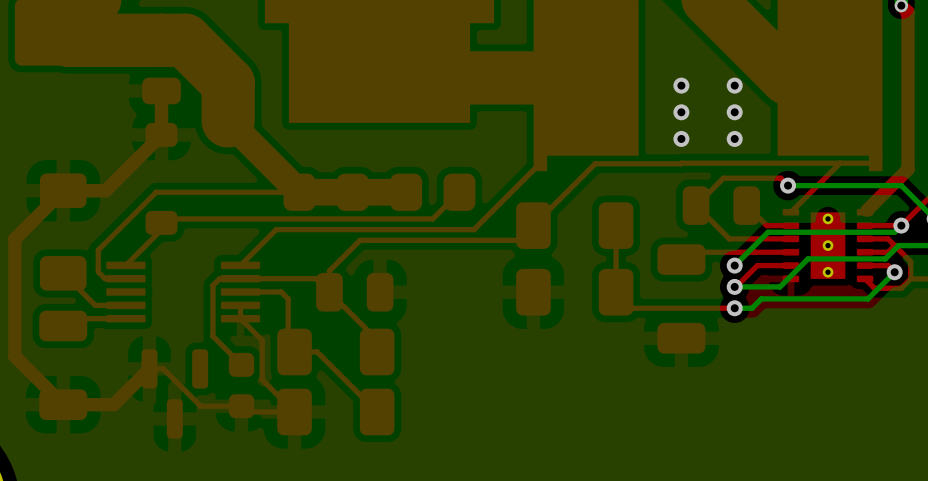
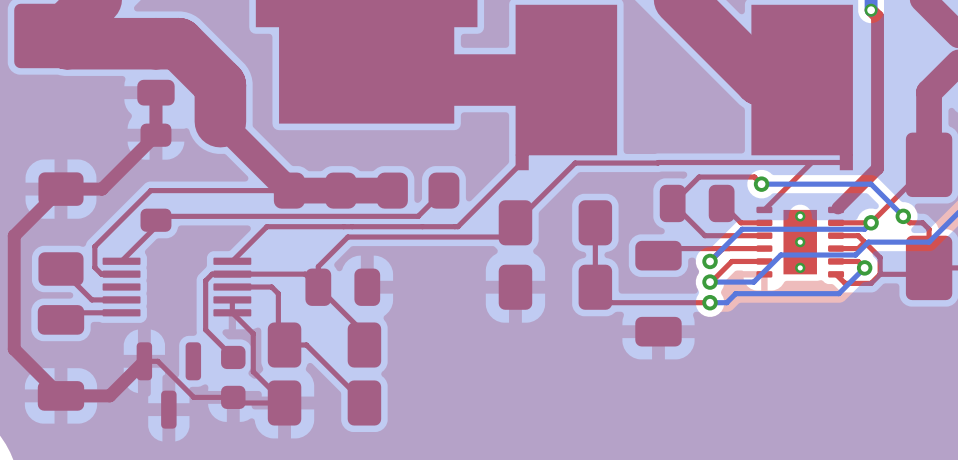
via: (681, 85) -> none
via: (734, 85) -> none
via: (681, 112) -> none
via: (734, 112) -> none
via: (681, 138) -> none
via: (734, 138) -> none

